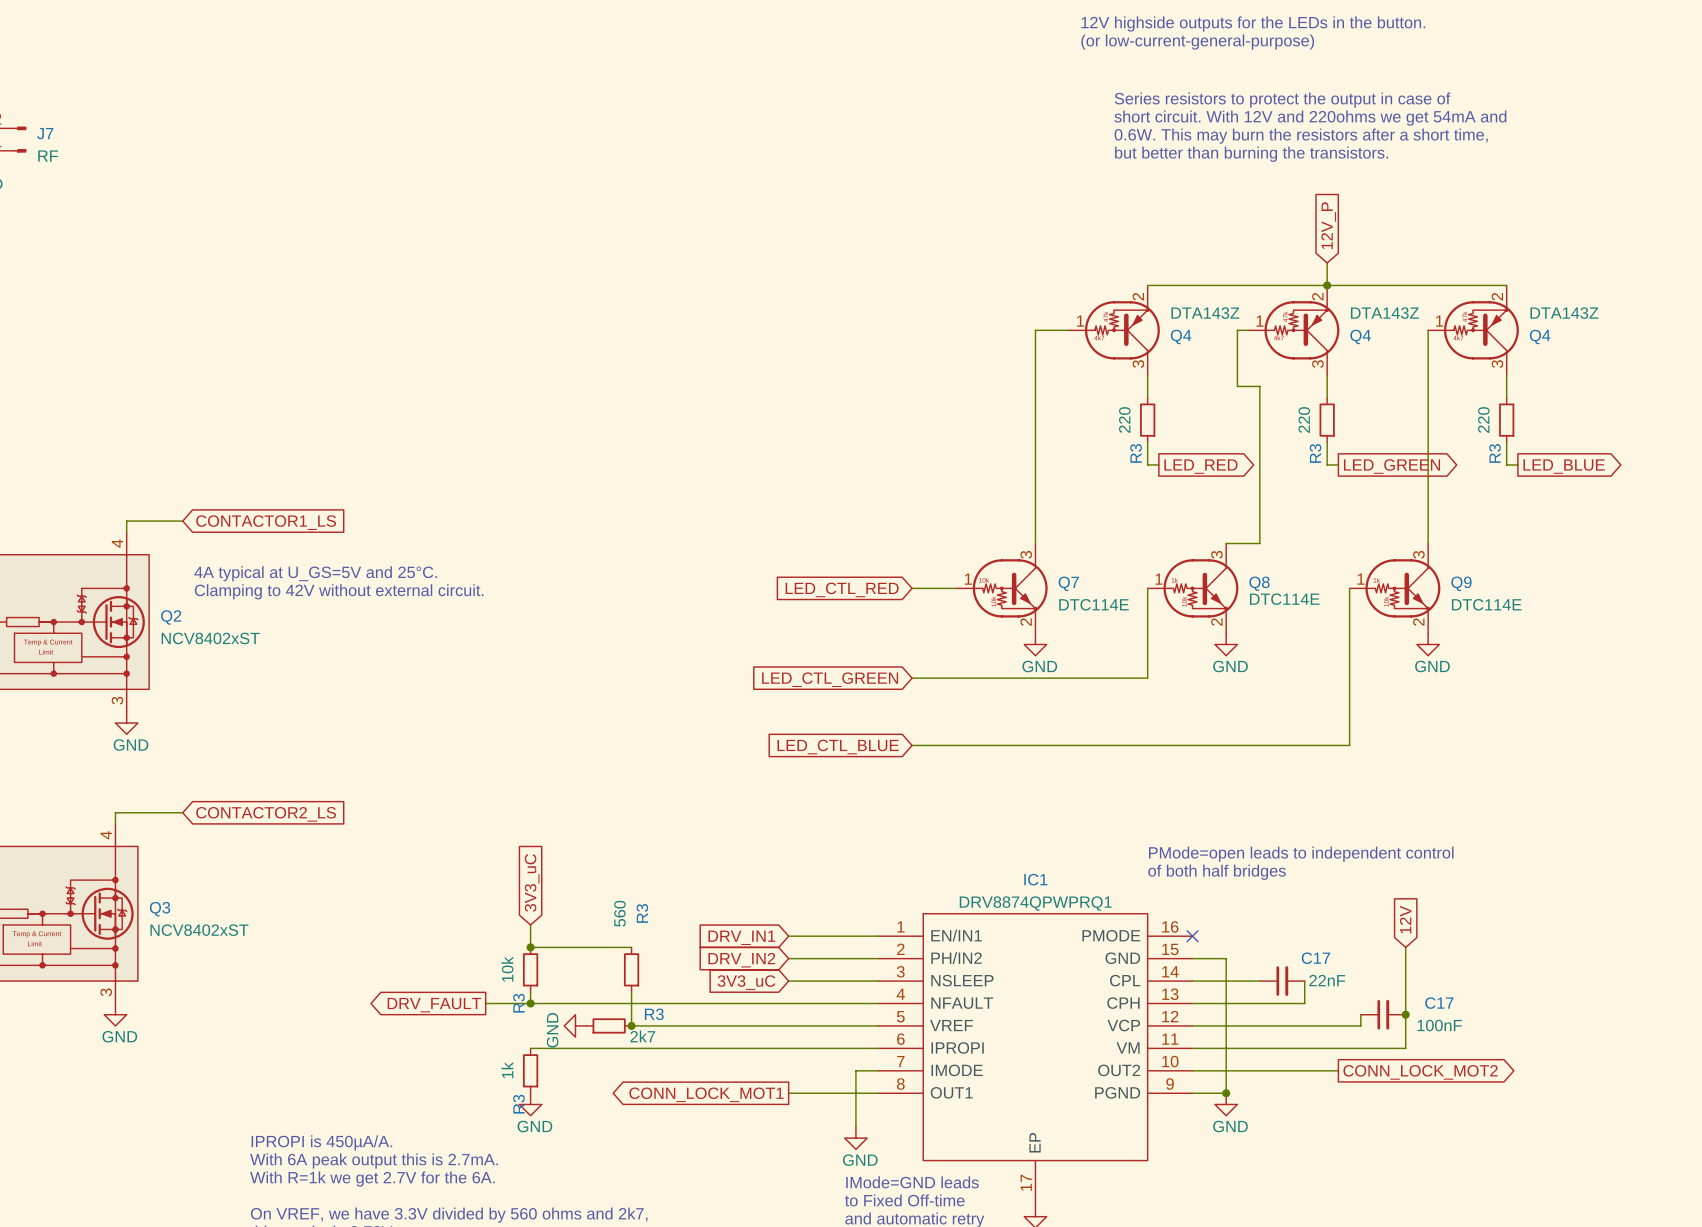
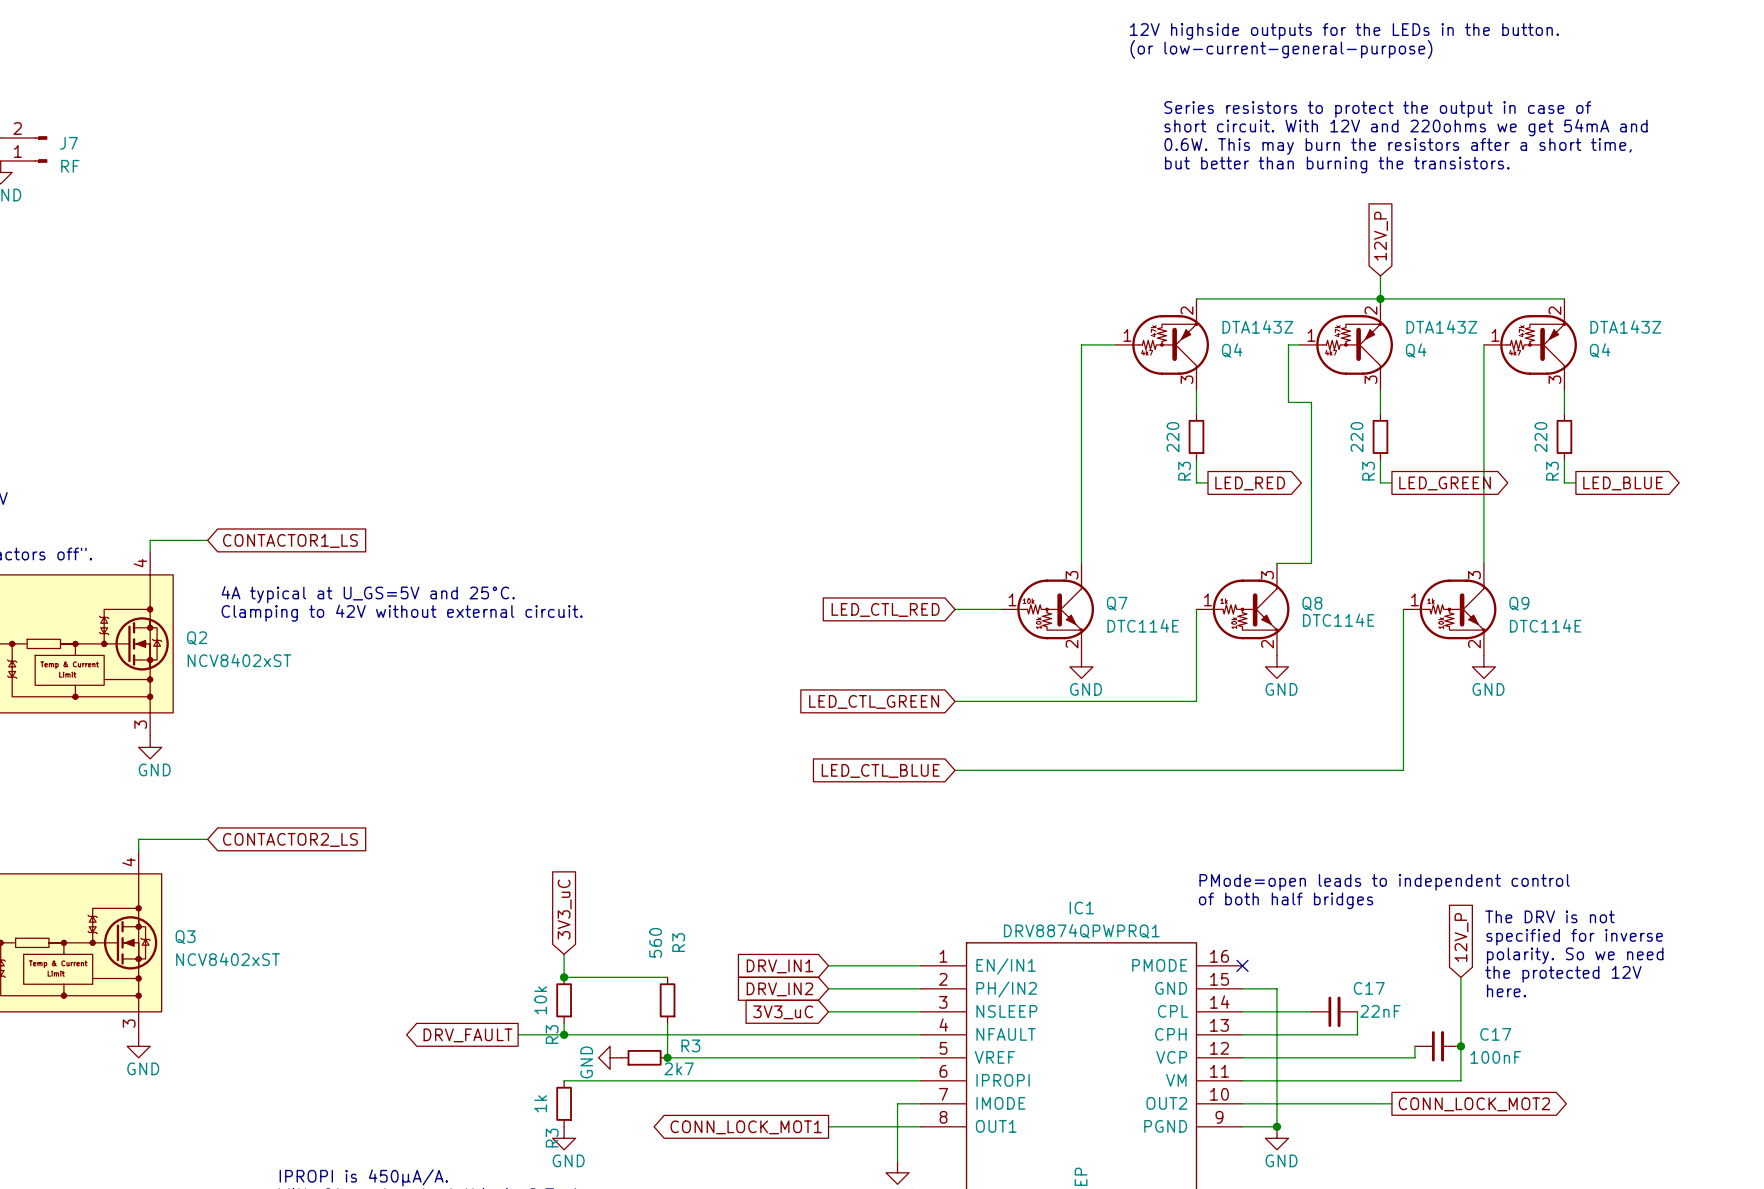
text: none -> The DRV is not (1550, 916)
text: none -> specified for inverse (1574, 937)
global label: 12V (1405, 919) -> 12V_P (1461, 937)
text: none -> polarity. So we need (1575, 955)
text: none -> the protected 12V (1563, 974)
text: none -> here. (1506, 990)

